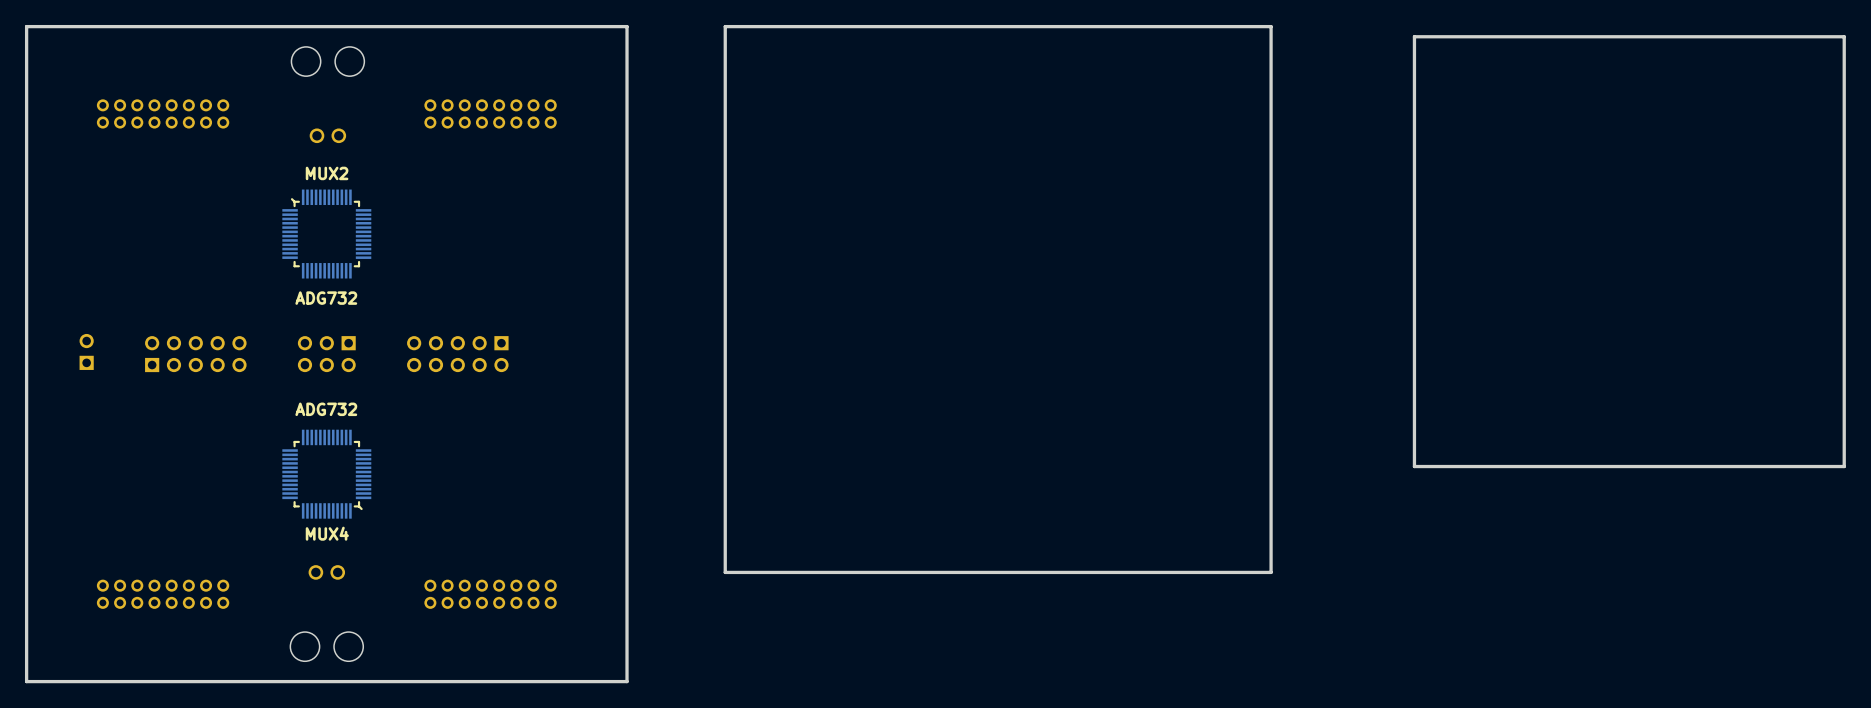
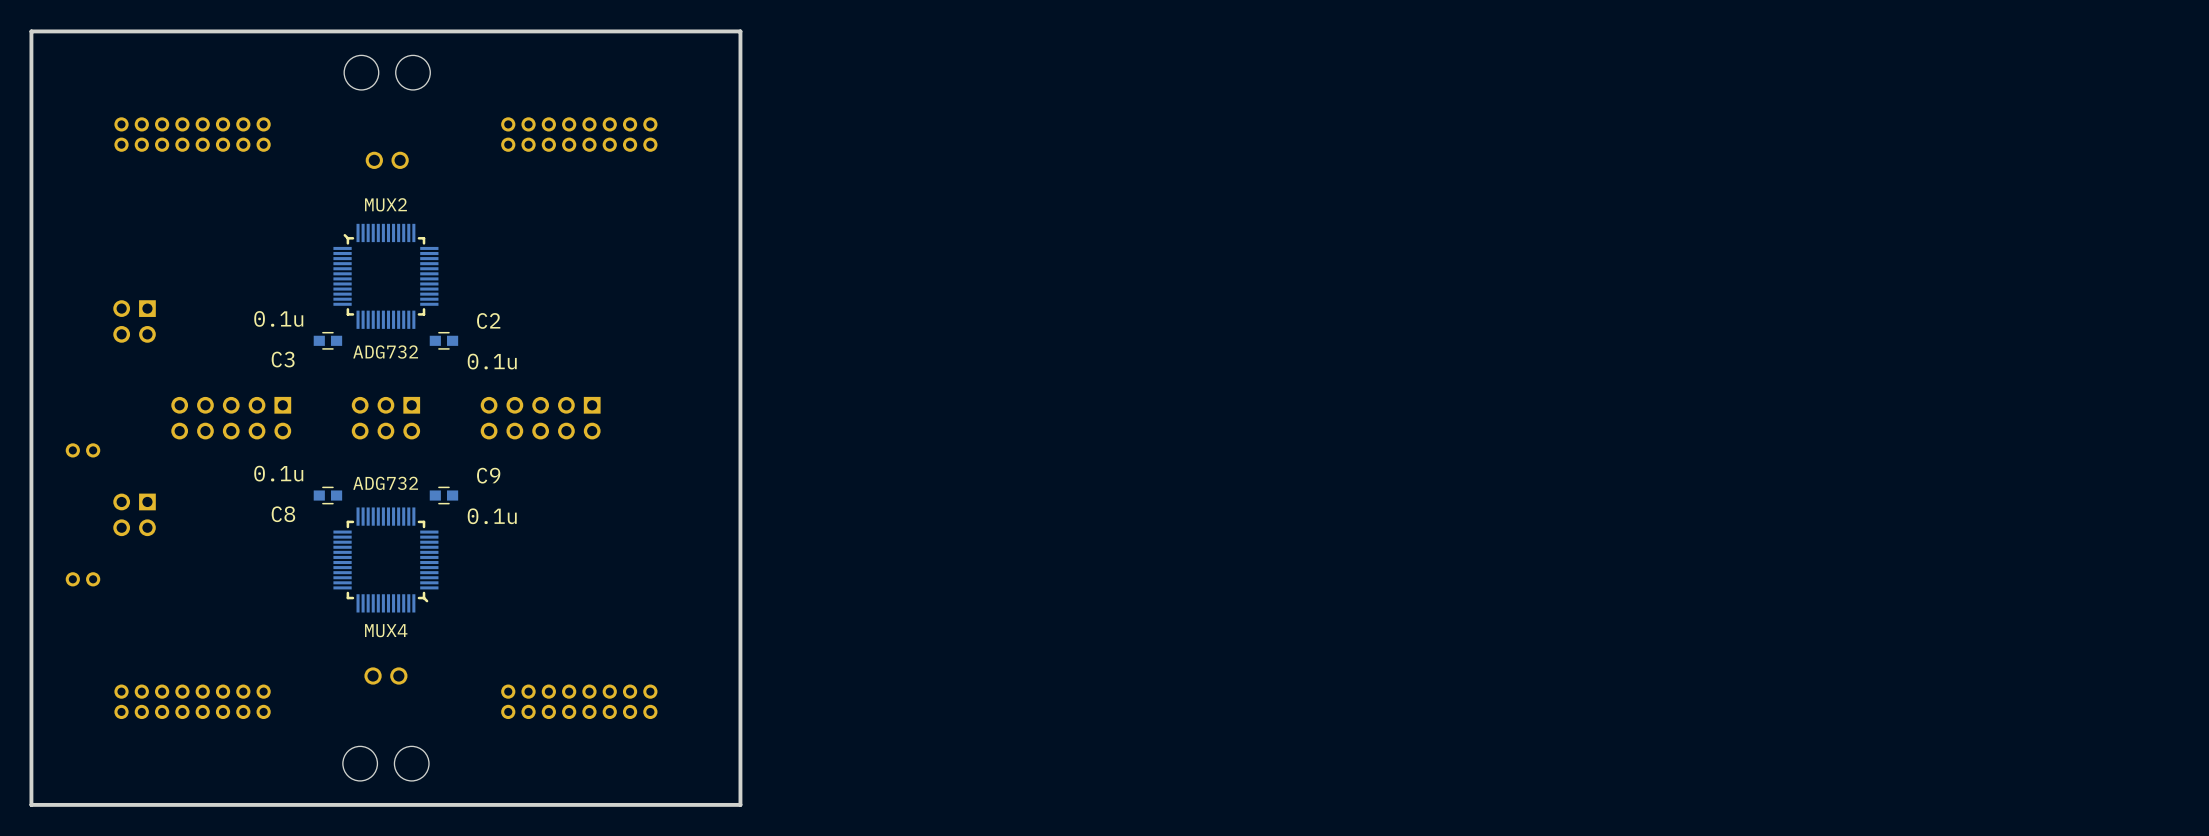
board edge: (1271, 26) (725, 26) (725, 572) (1271, 572) (1271, 26) -> none
board edge: (1844, 36) (1414, 36) (1414, 466) (1844, 466) (1844, 36) -> none
part: none -> (134, 321)
C3: none -> 0.1u (327, 340)
C2: none -> 0.1u (443, 340)
part: (86, 351) -> none
part rotation: 0° (195, 354) -> 180° (231, 418)
part: none -> (82, 450)
C8: none -> 0.1u (327, 495)
C9: none -> 0.1u (443, 495)
part: none -> (134, 514)
part: none -> (82, 579)

